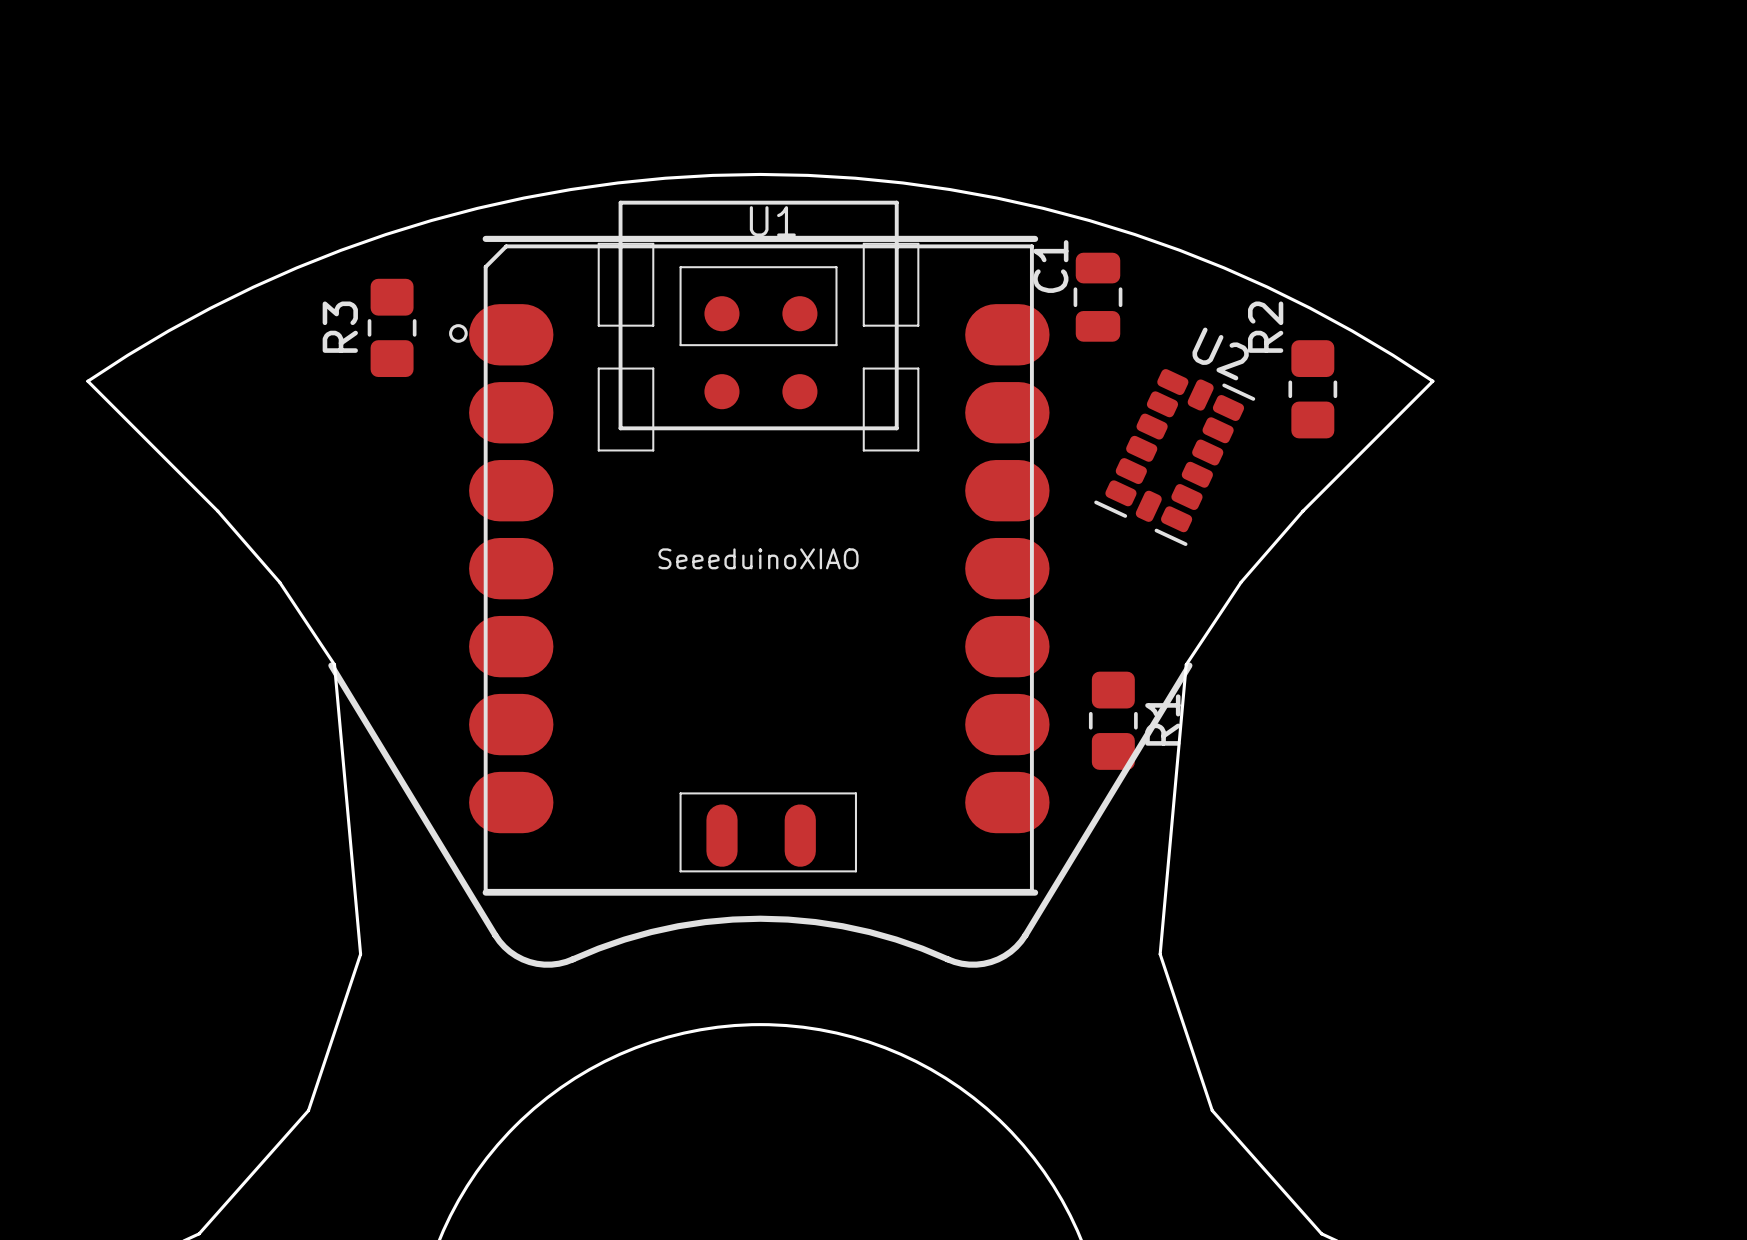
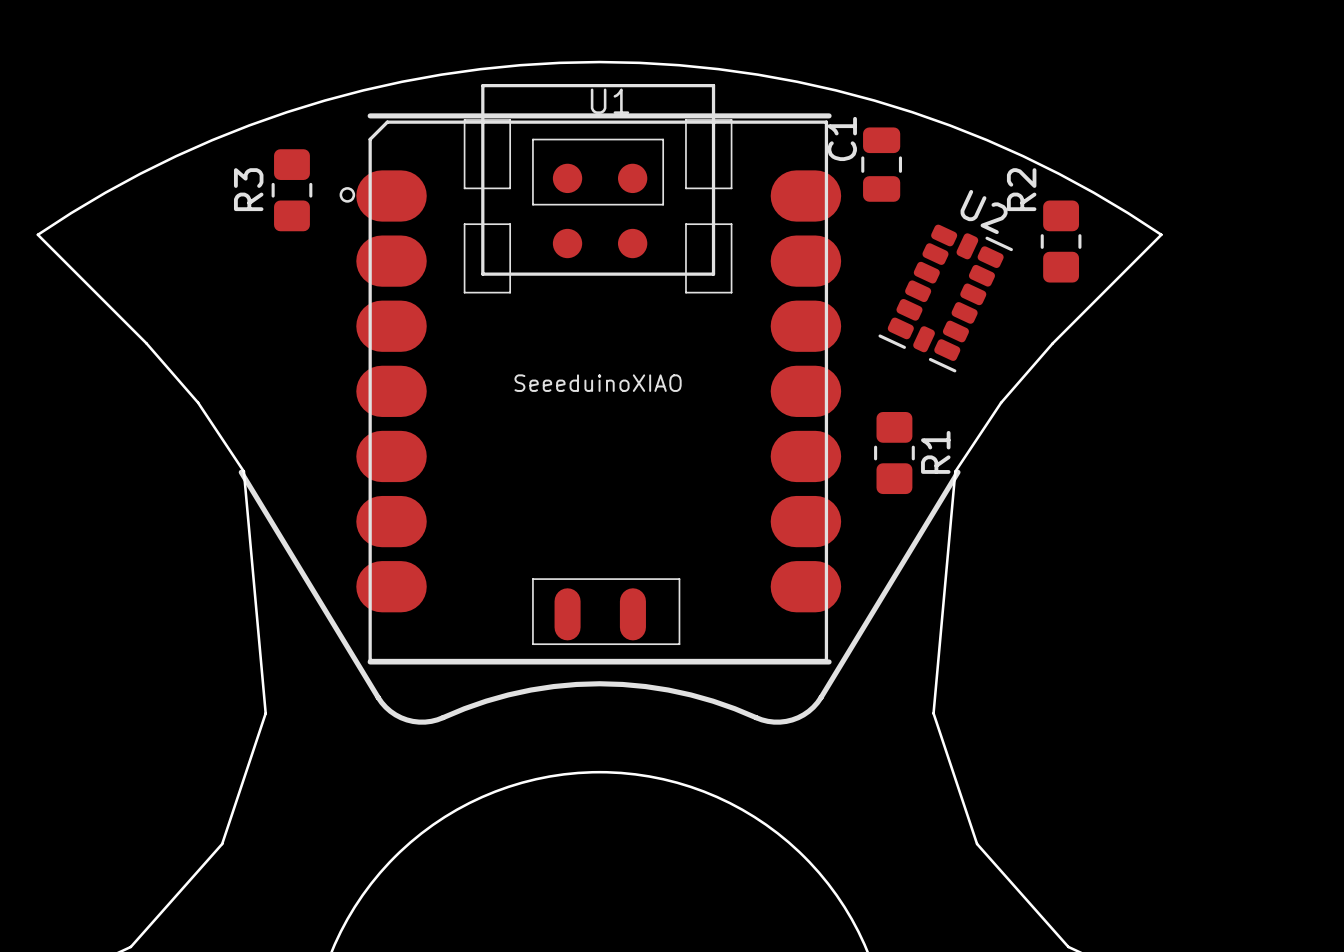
R1 position: (1113, 720) -> (894, 453)

